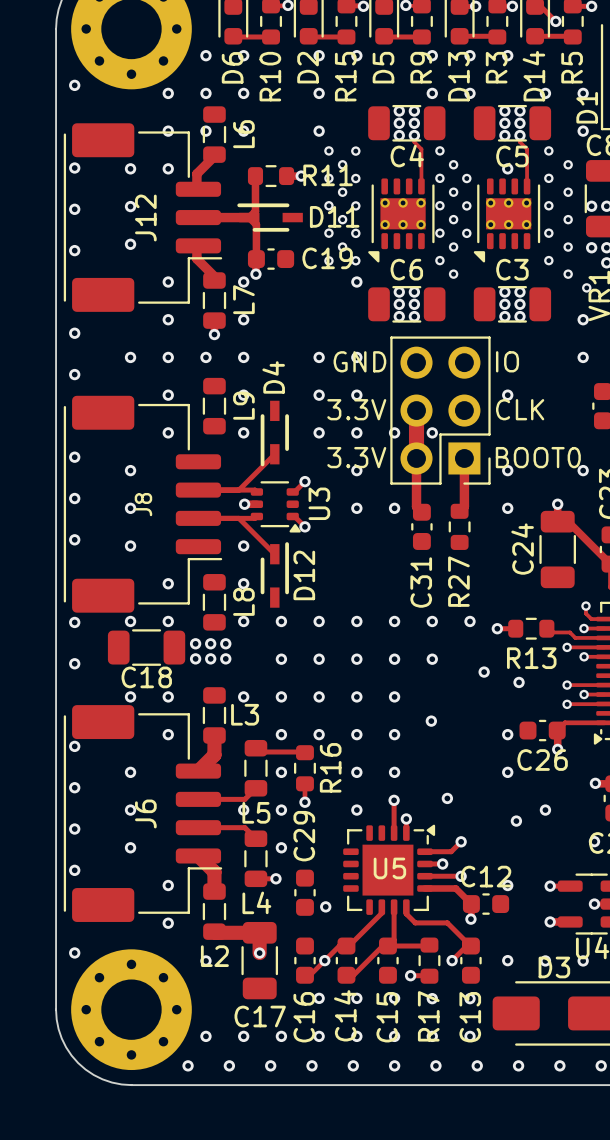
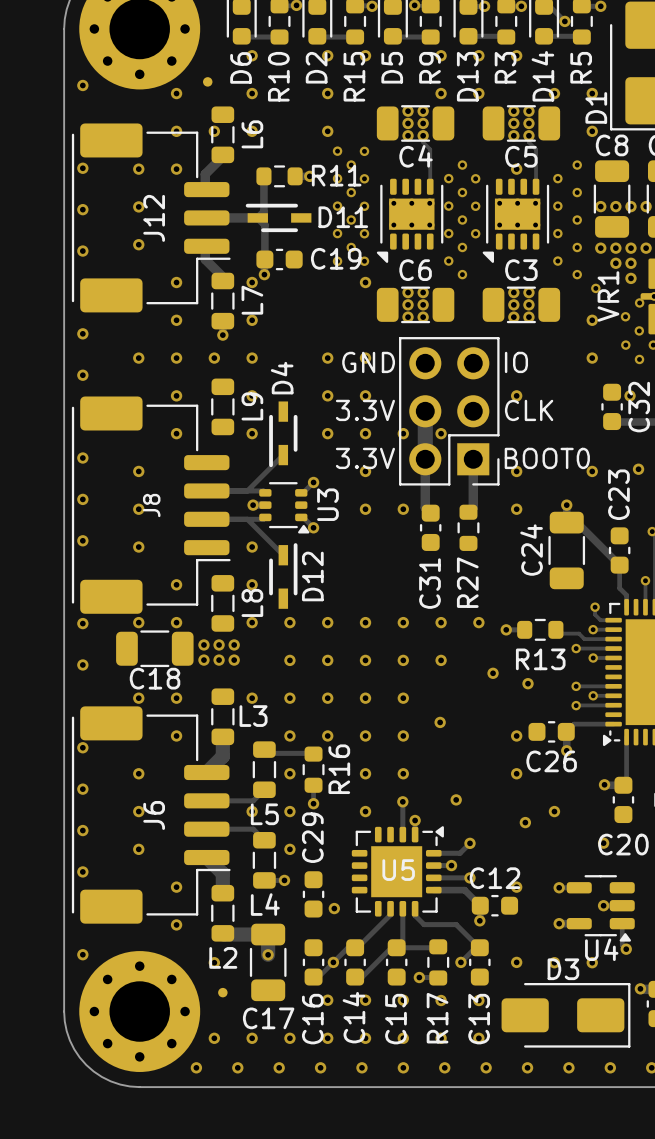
via: (205, 55) -> none
part: none -> (207, 81)
via: (205, 93) -> none
via: (439, 150) -> none
via: (548, 150) -> none
part: none -> (222, 992)

